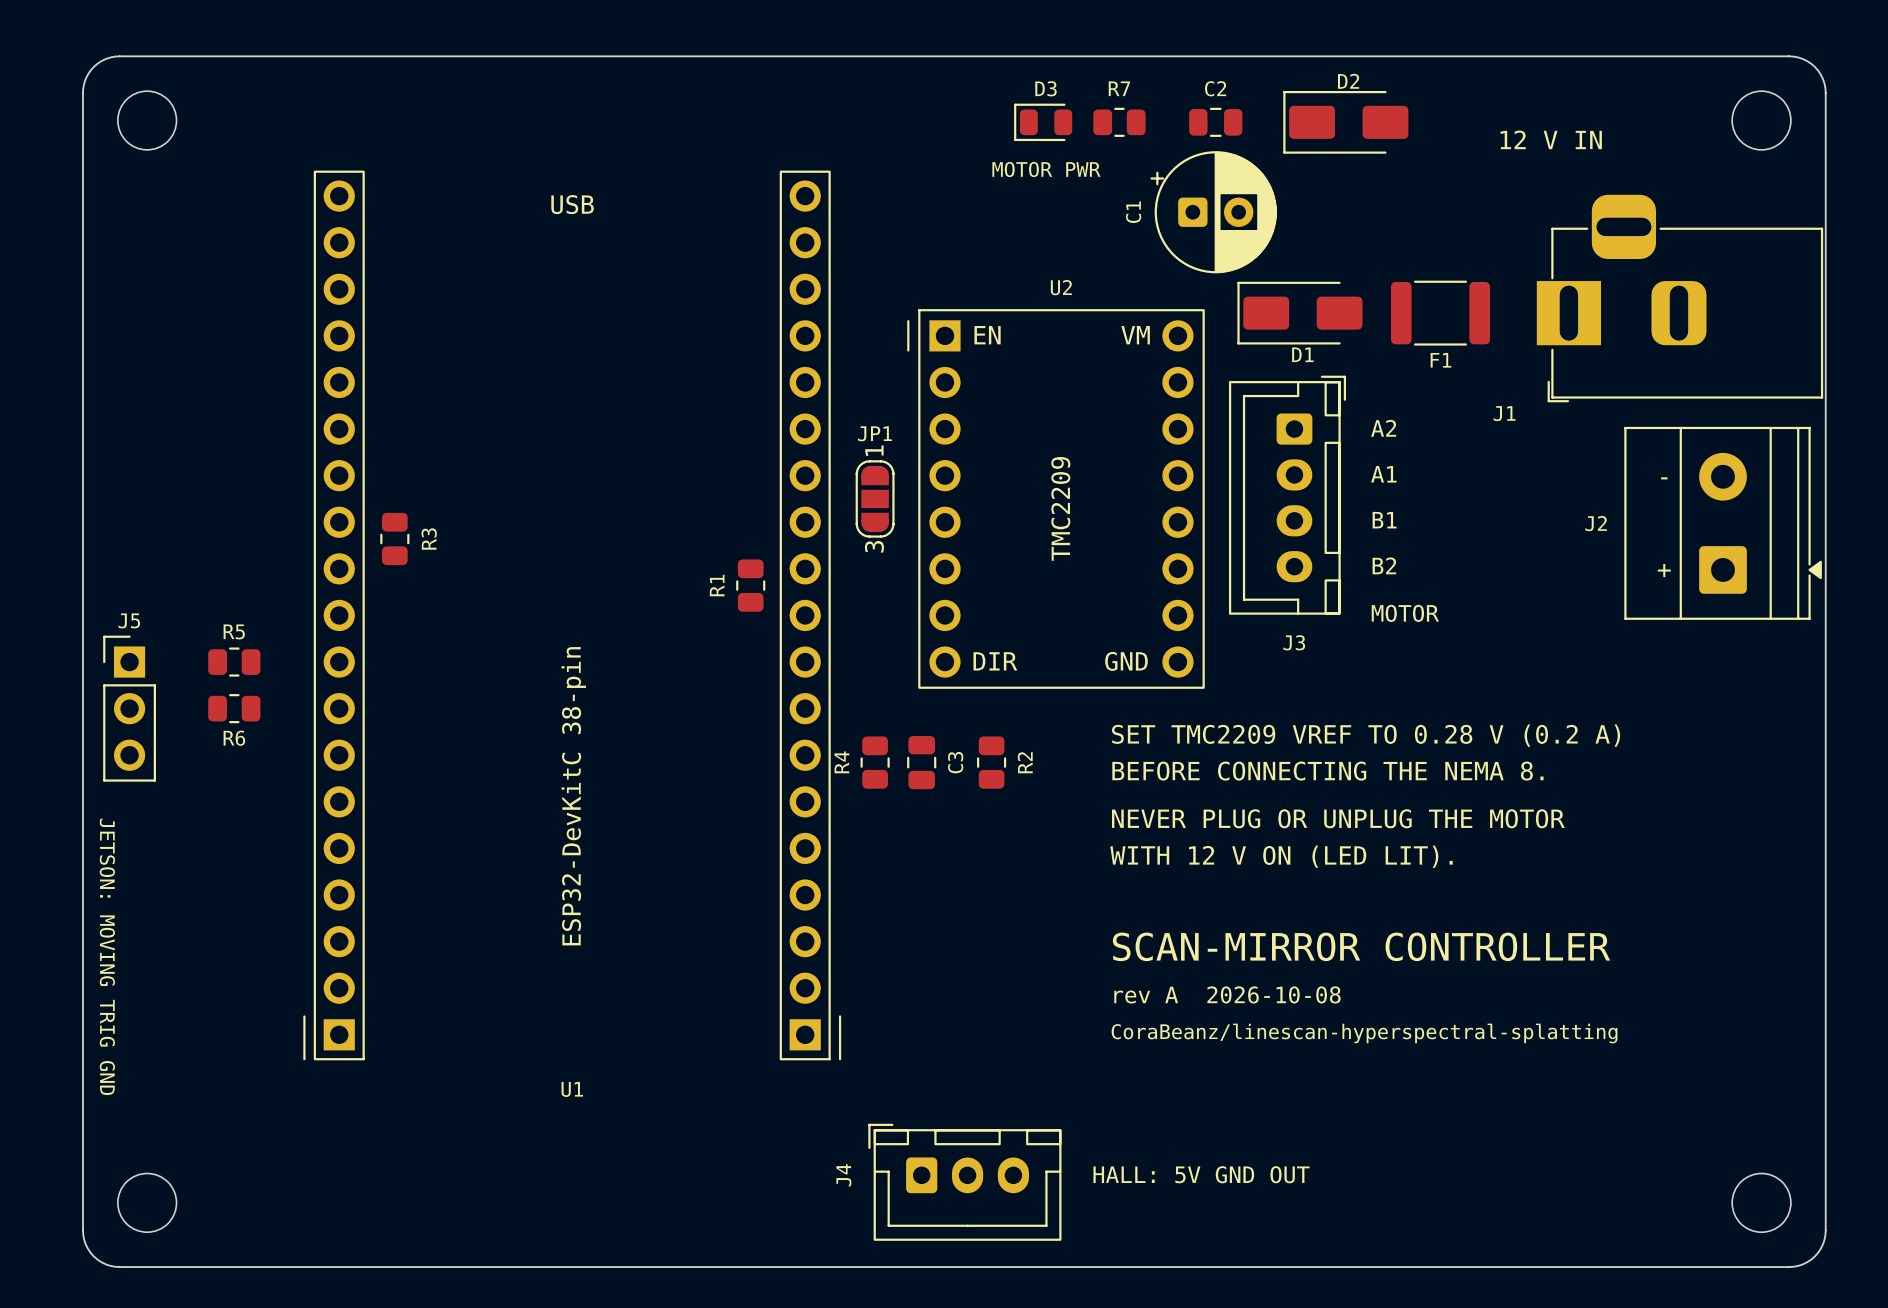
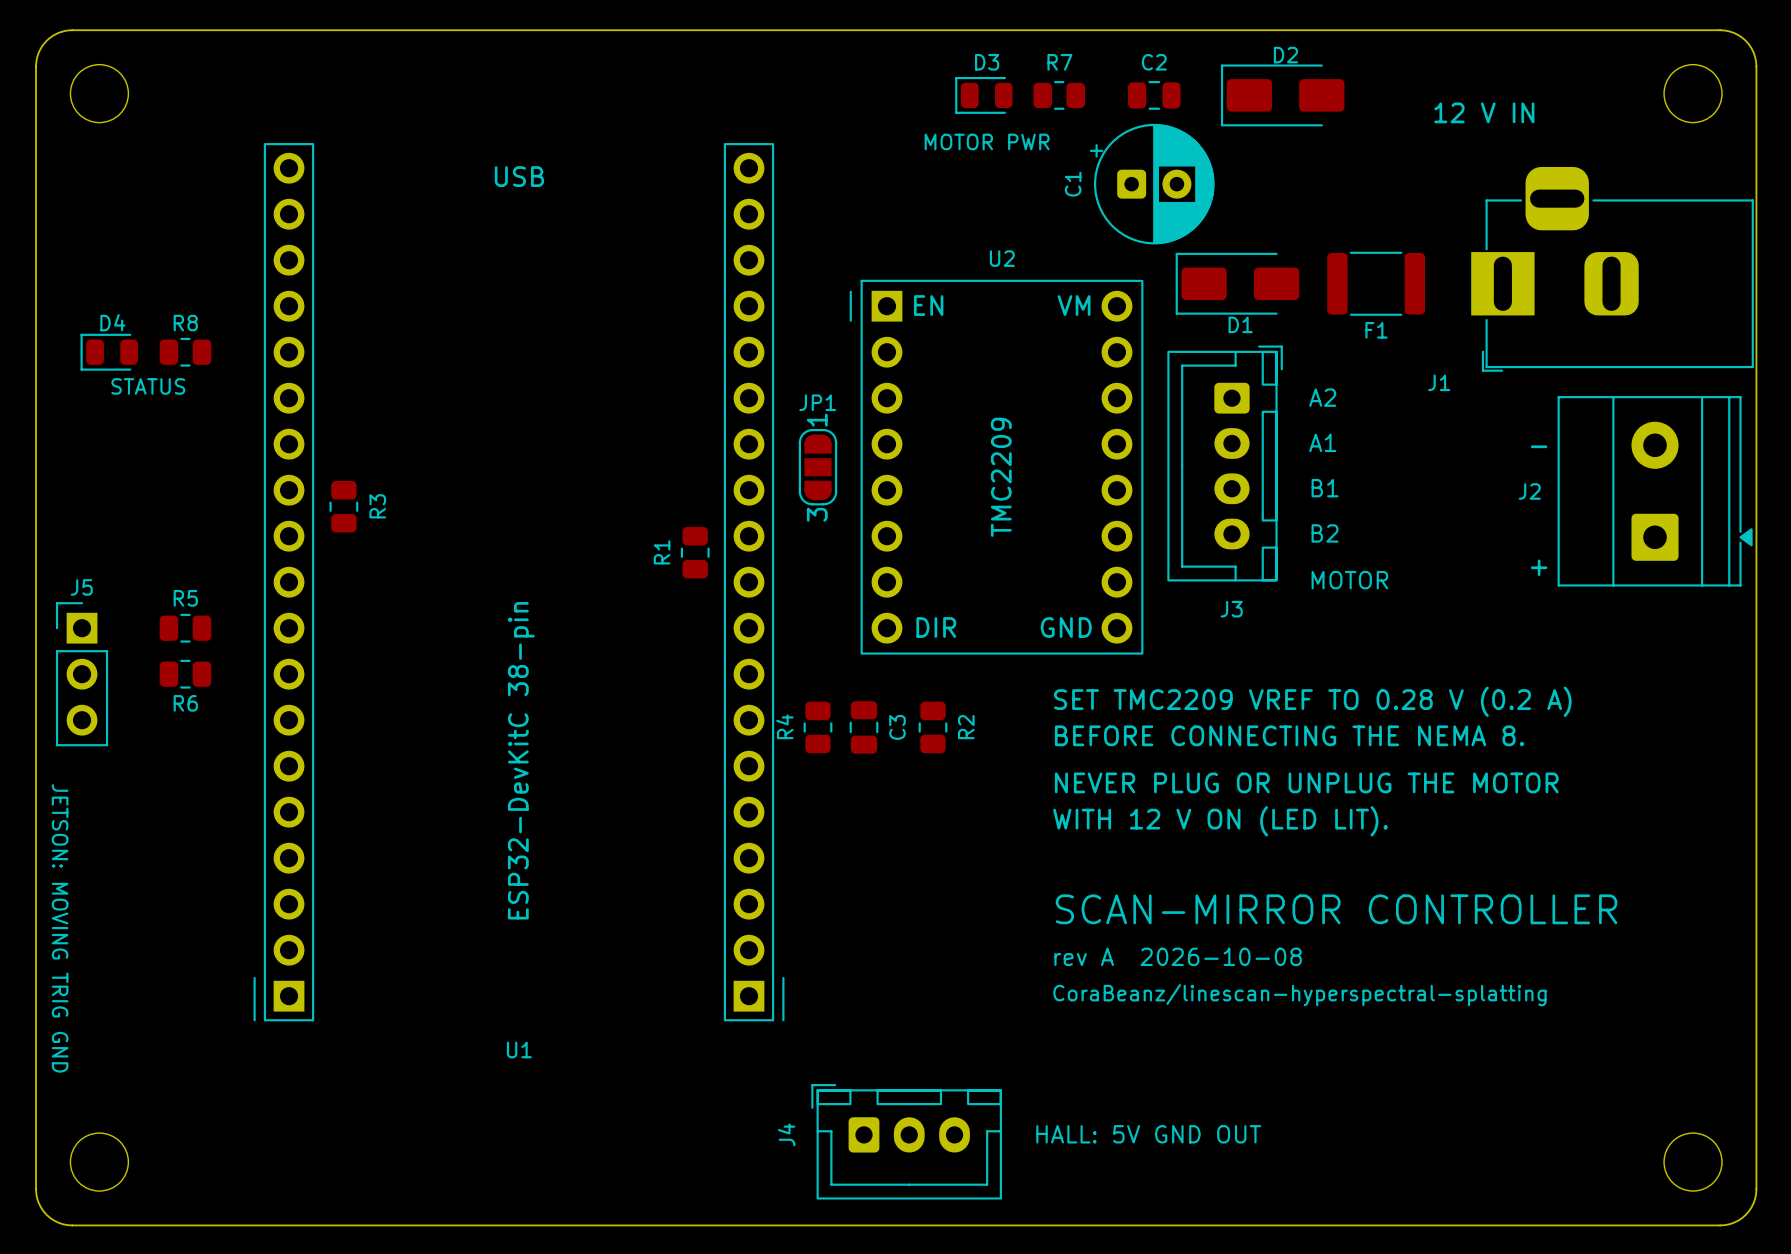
D4: none -> (109, 352)
R8: none -> (185, 352)
text: none -> STATUS (148, 386)
text position: - (1664, 478) -> - (1539, 446)
text position: + (1664, 570) -> + (1539, 567)

